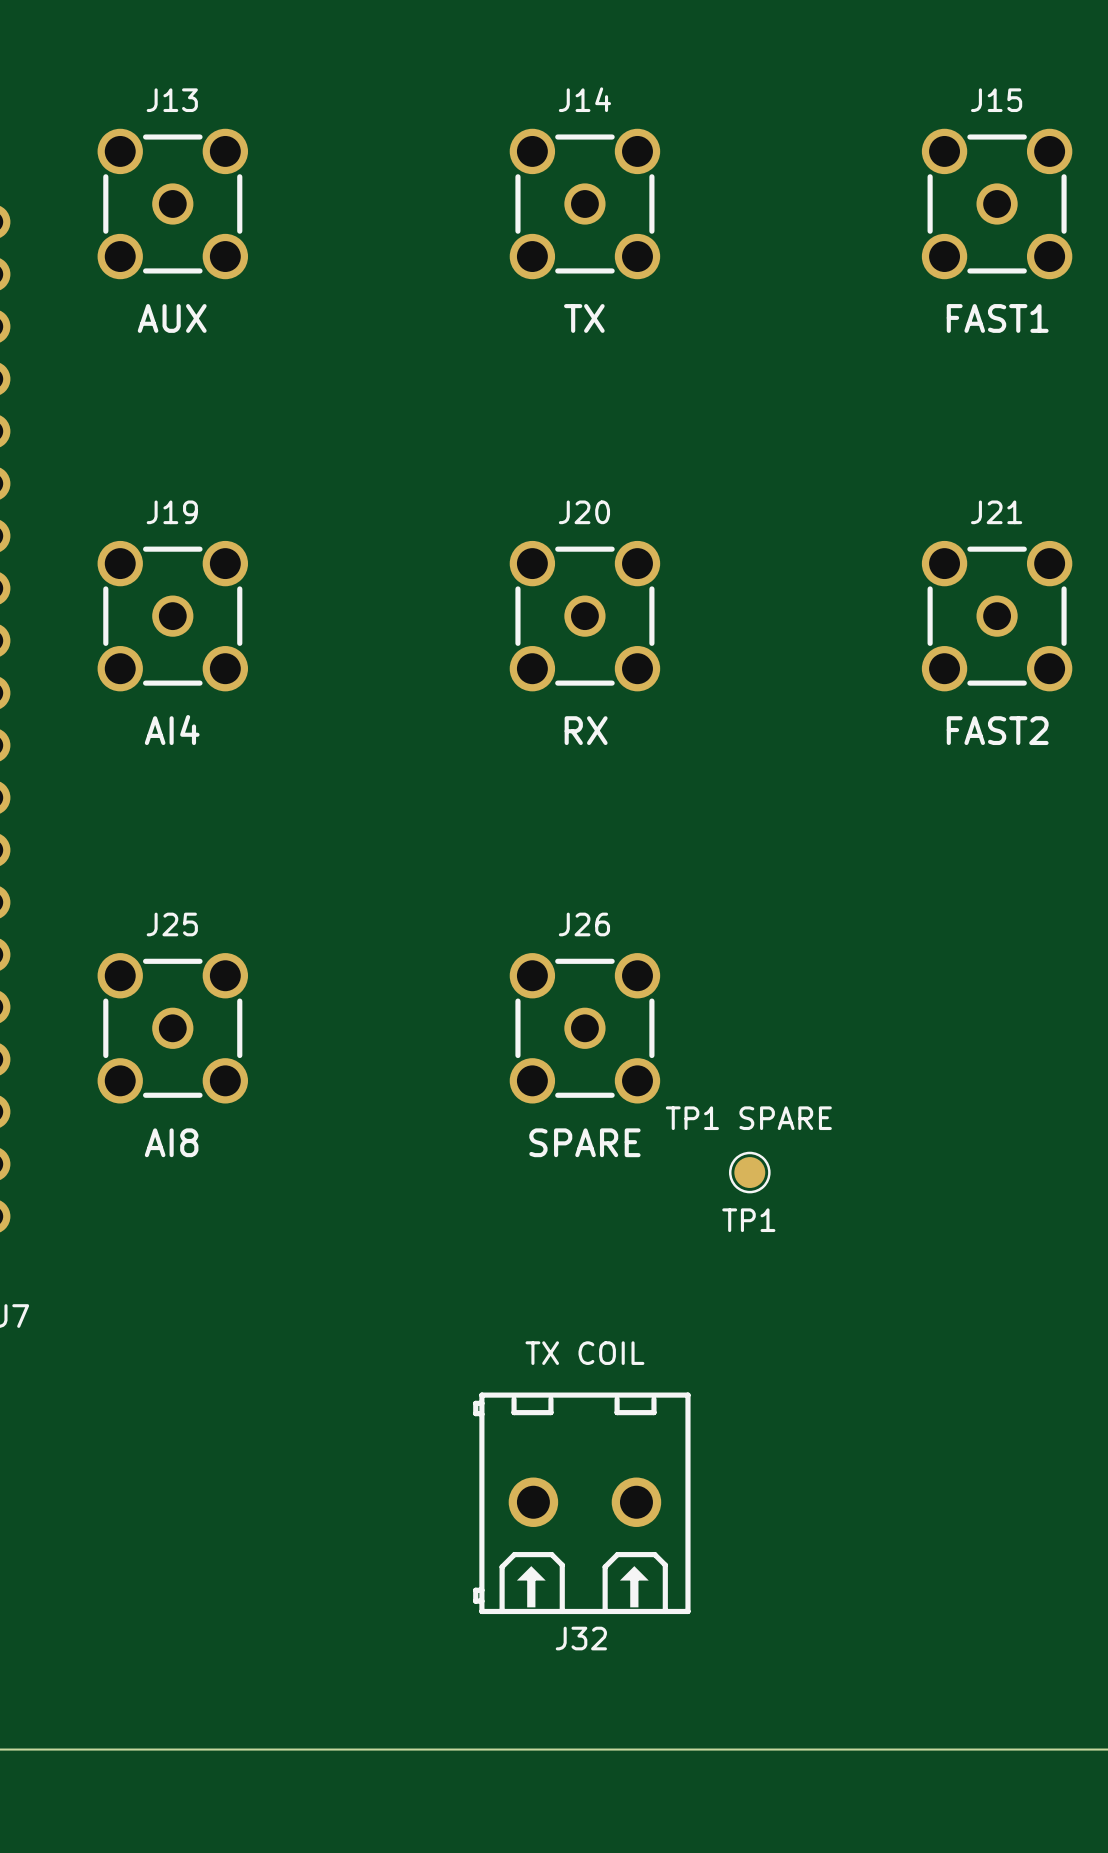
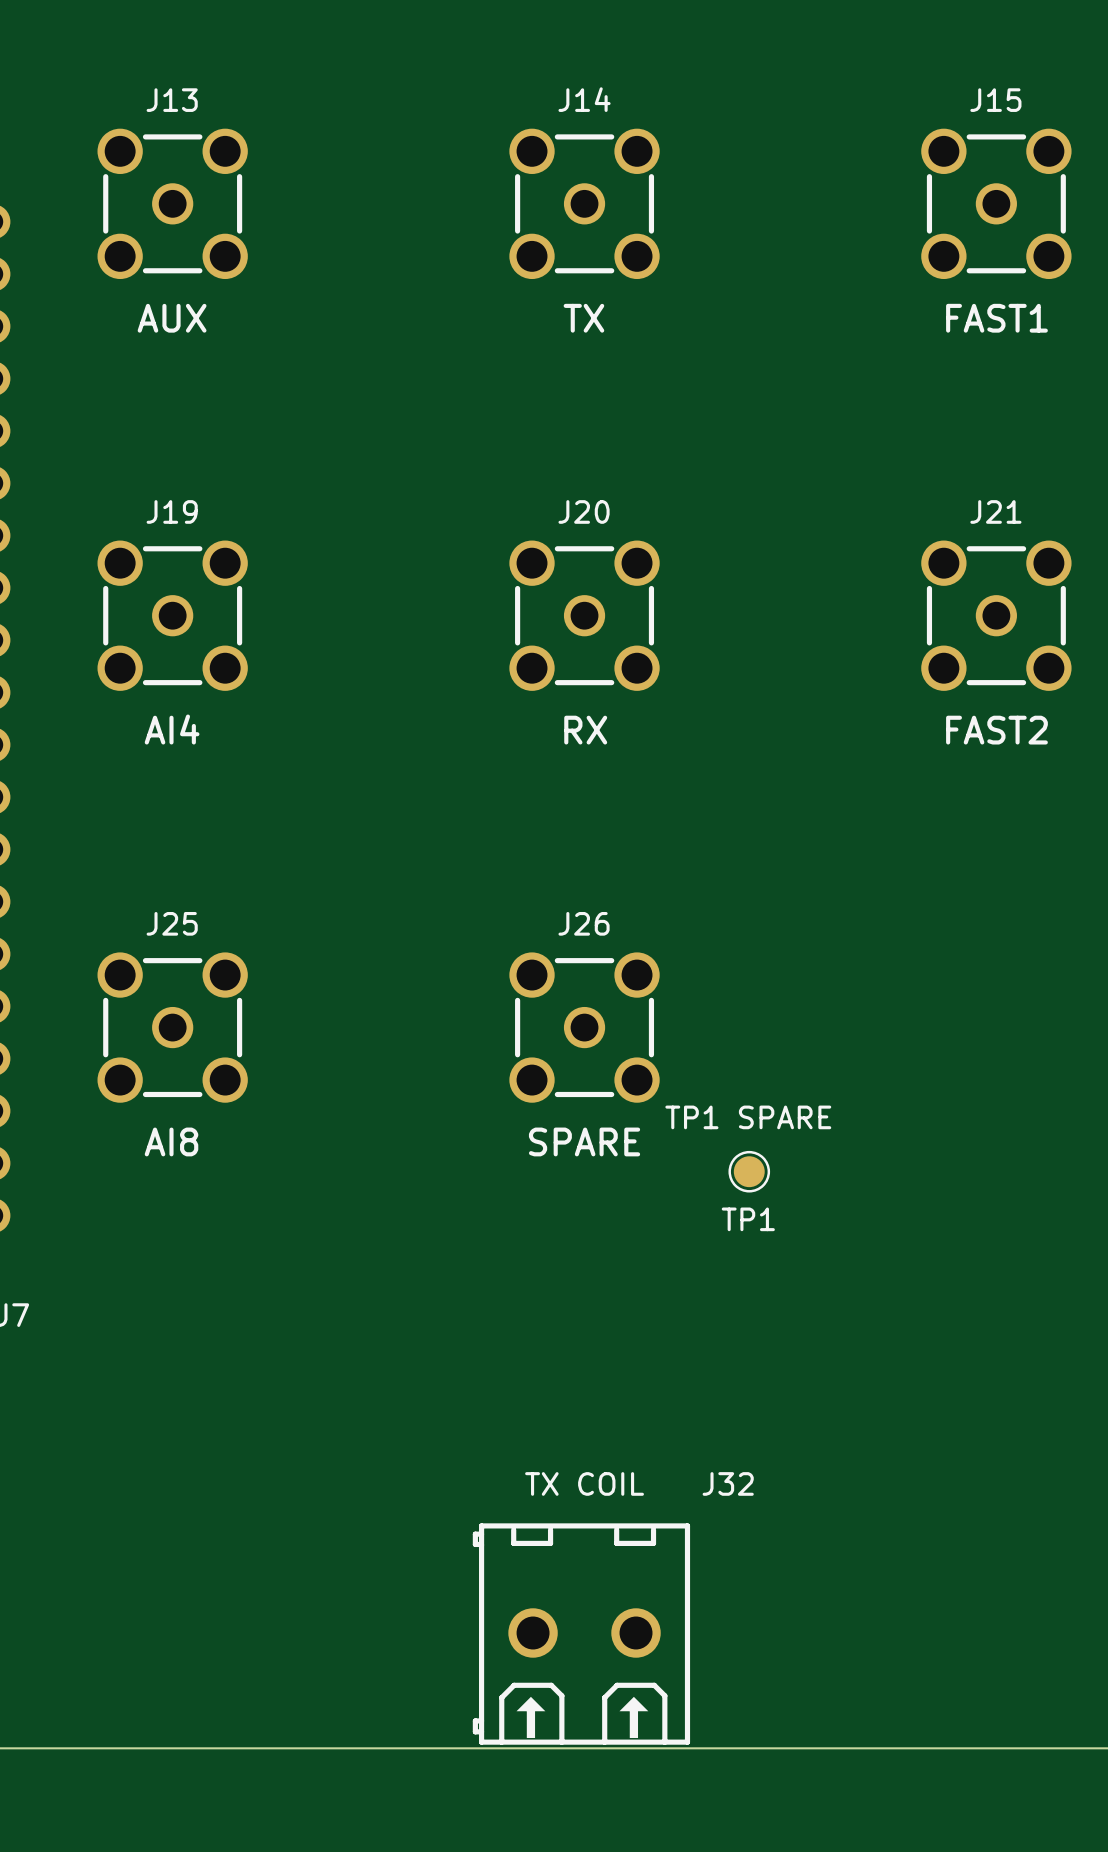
text position: TX COIL (584, 1353) -> TX COIL (584, 1483)
J32 position: (581, 1503) -> (581, 1634)
J32 name position: J32 (581, 1638) -> J32 (728, 1483)

